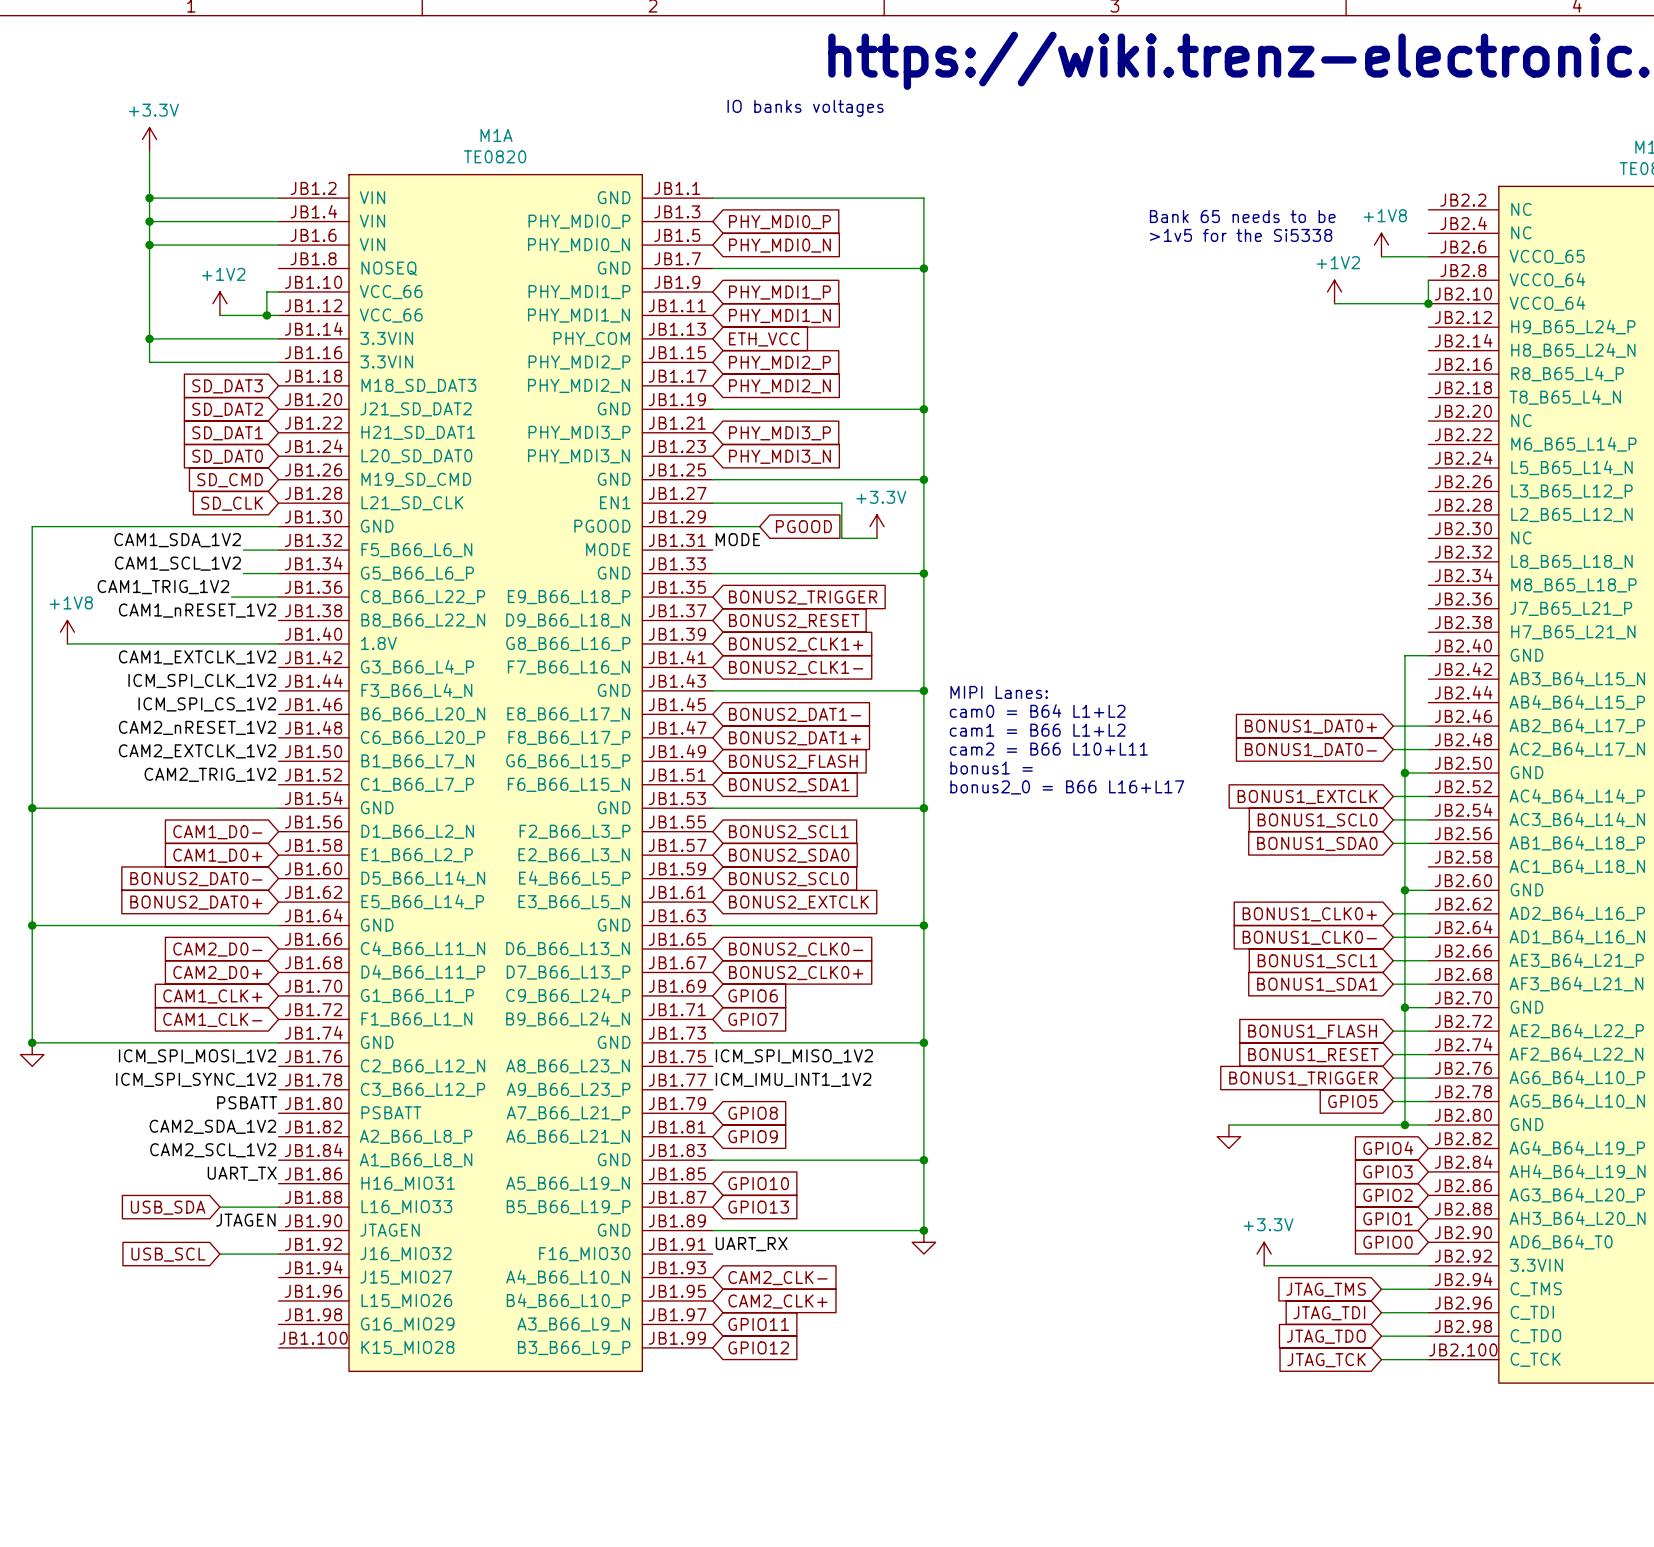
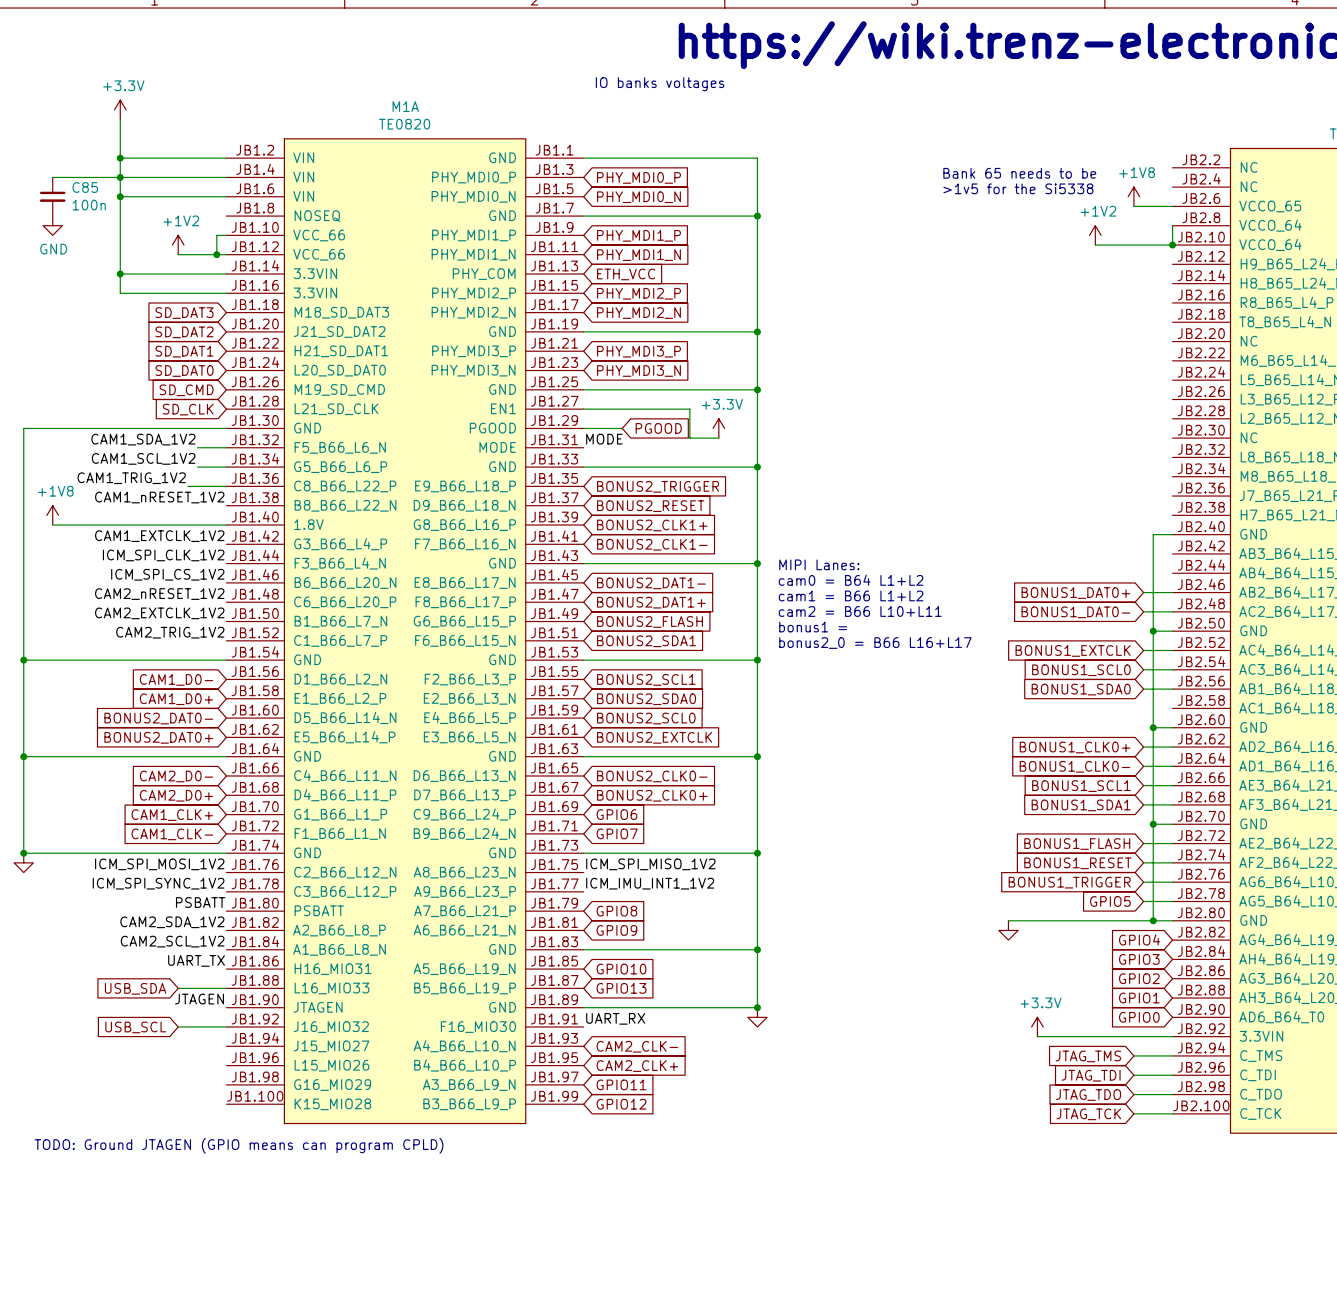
wire: none -> (52, 177) (120, 177)
C85: none -> 100n (52, 196)
power symbol: none -> GND (52, 225)
text: none -> TODO: Ground JTAGEN (GPIO means can program CPLD) (238, 1145)

